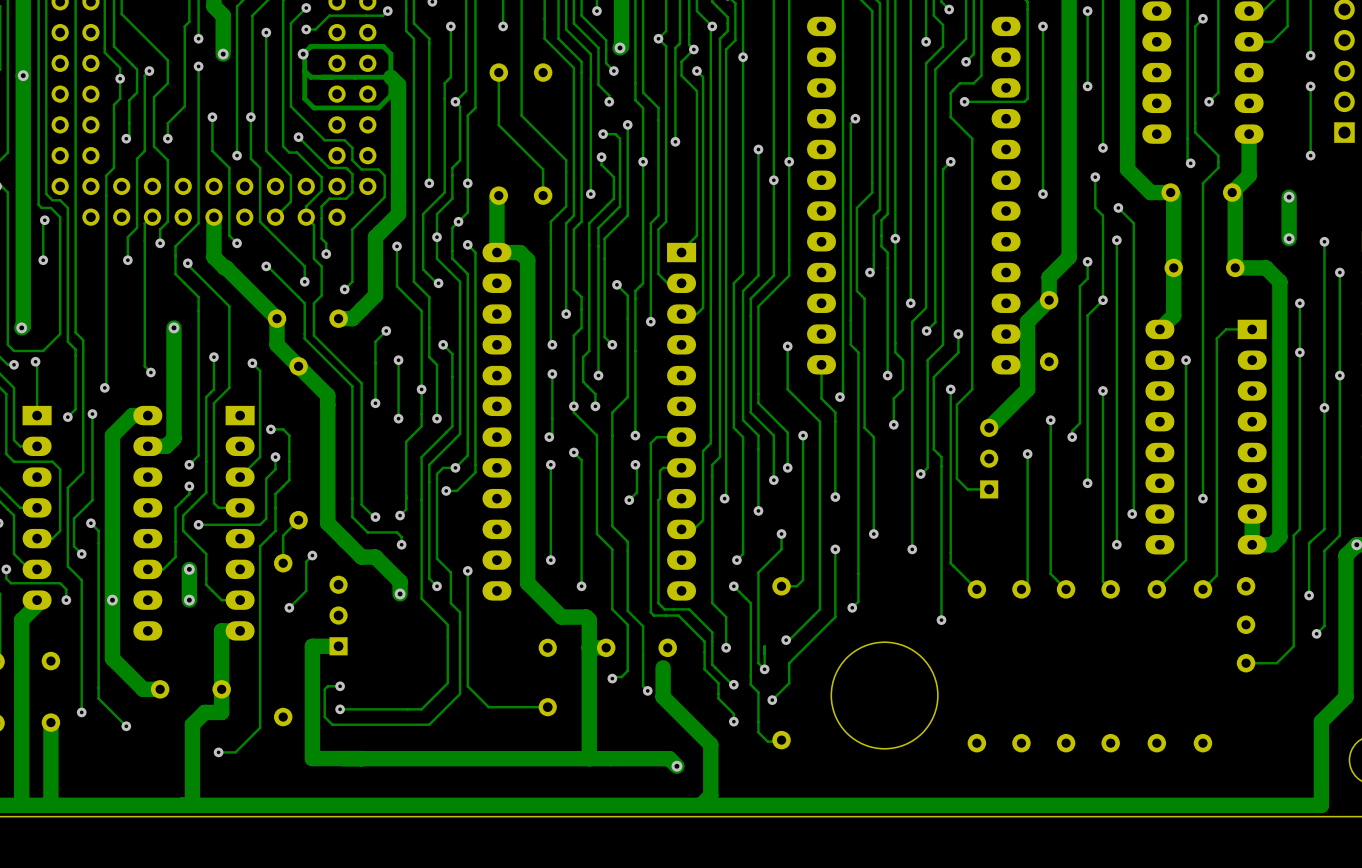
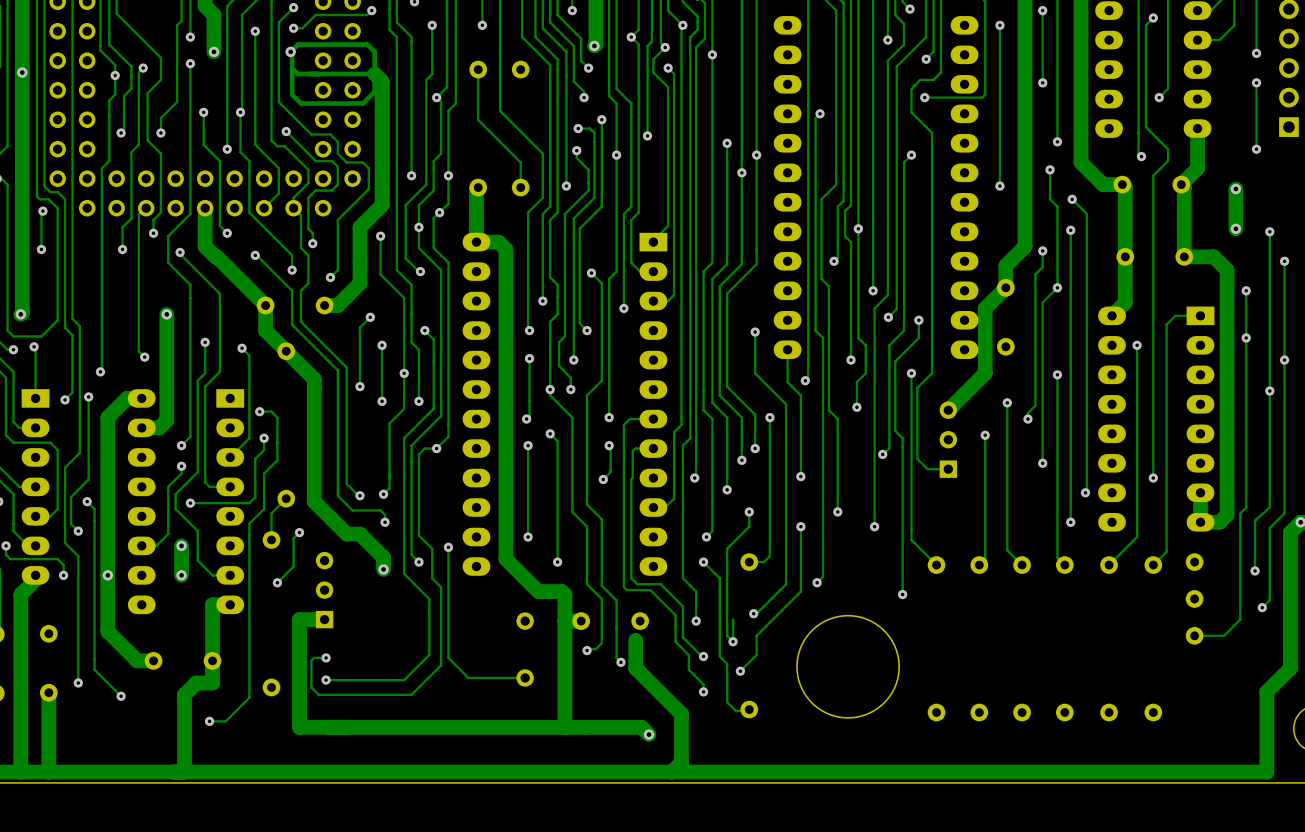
track: (467, 244) (475, 252) (475, 472) (457, 490) (446, 490) -> none
via: (467, 244) -> none
via: (446, 490) -> none

